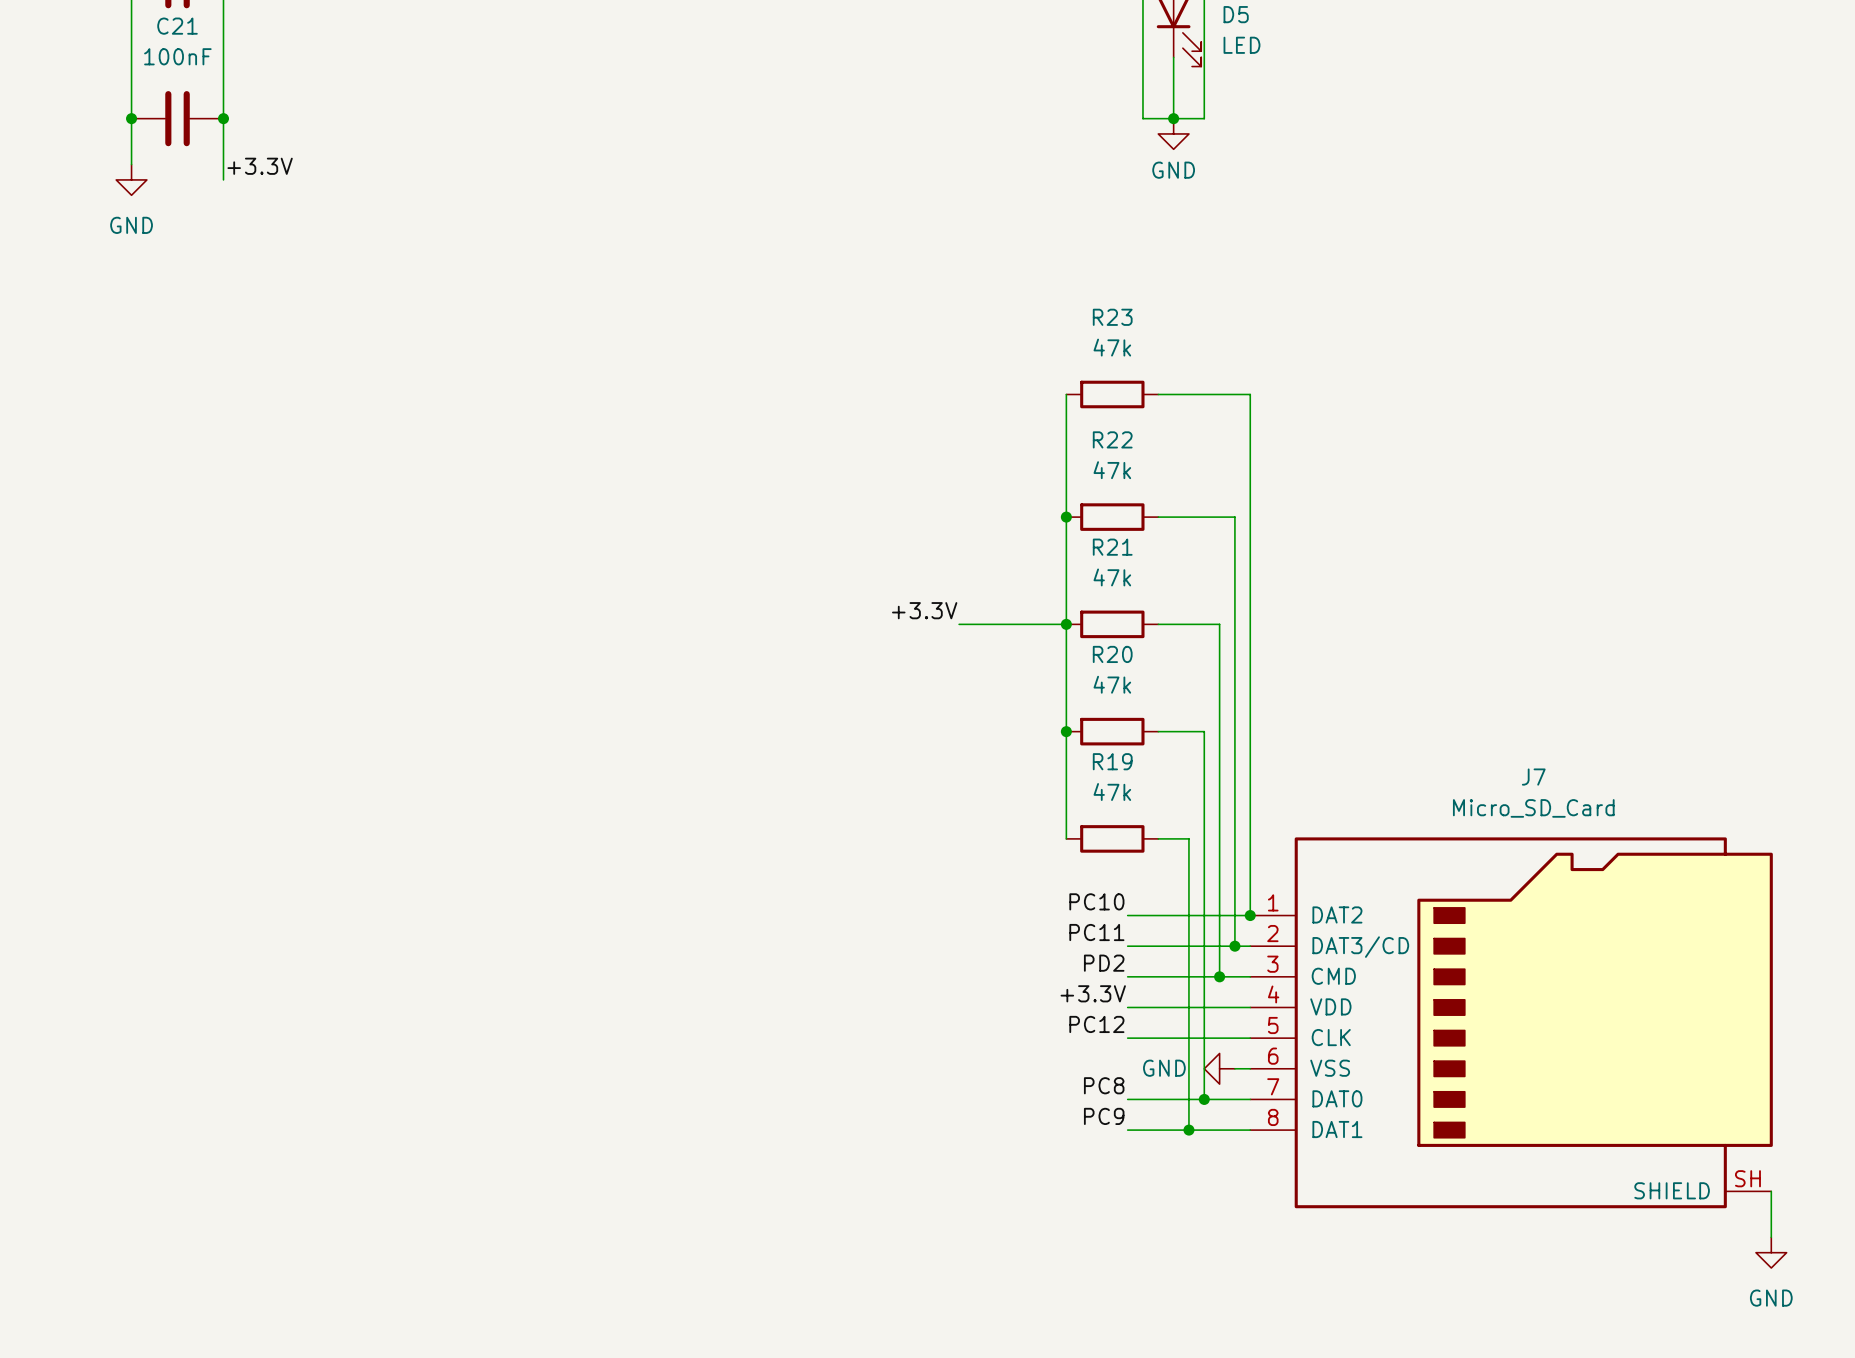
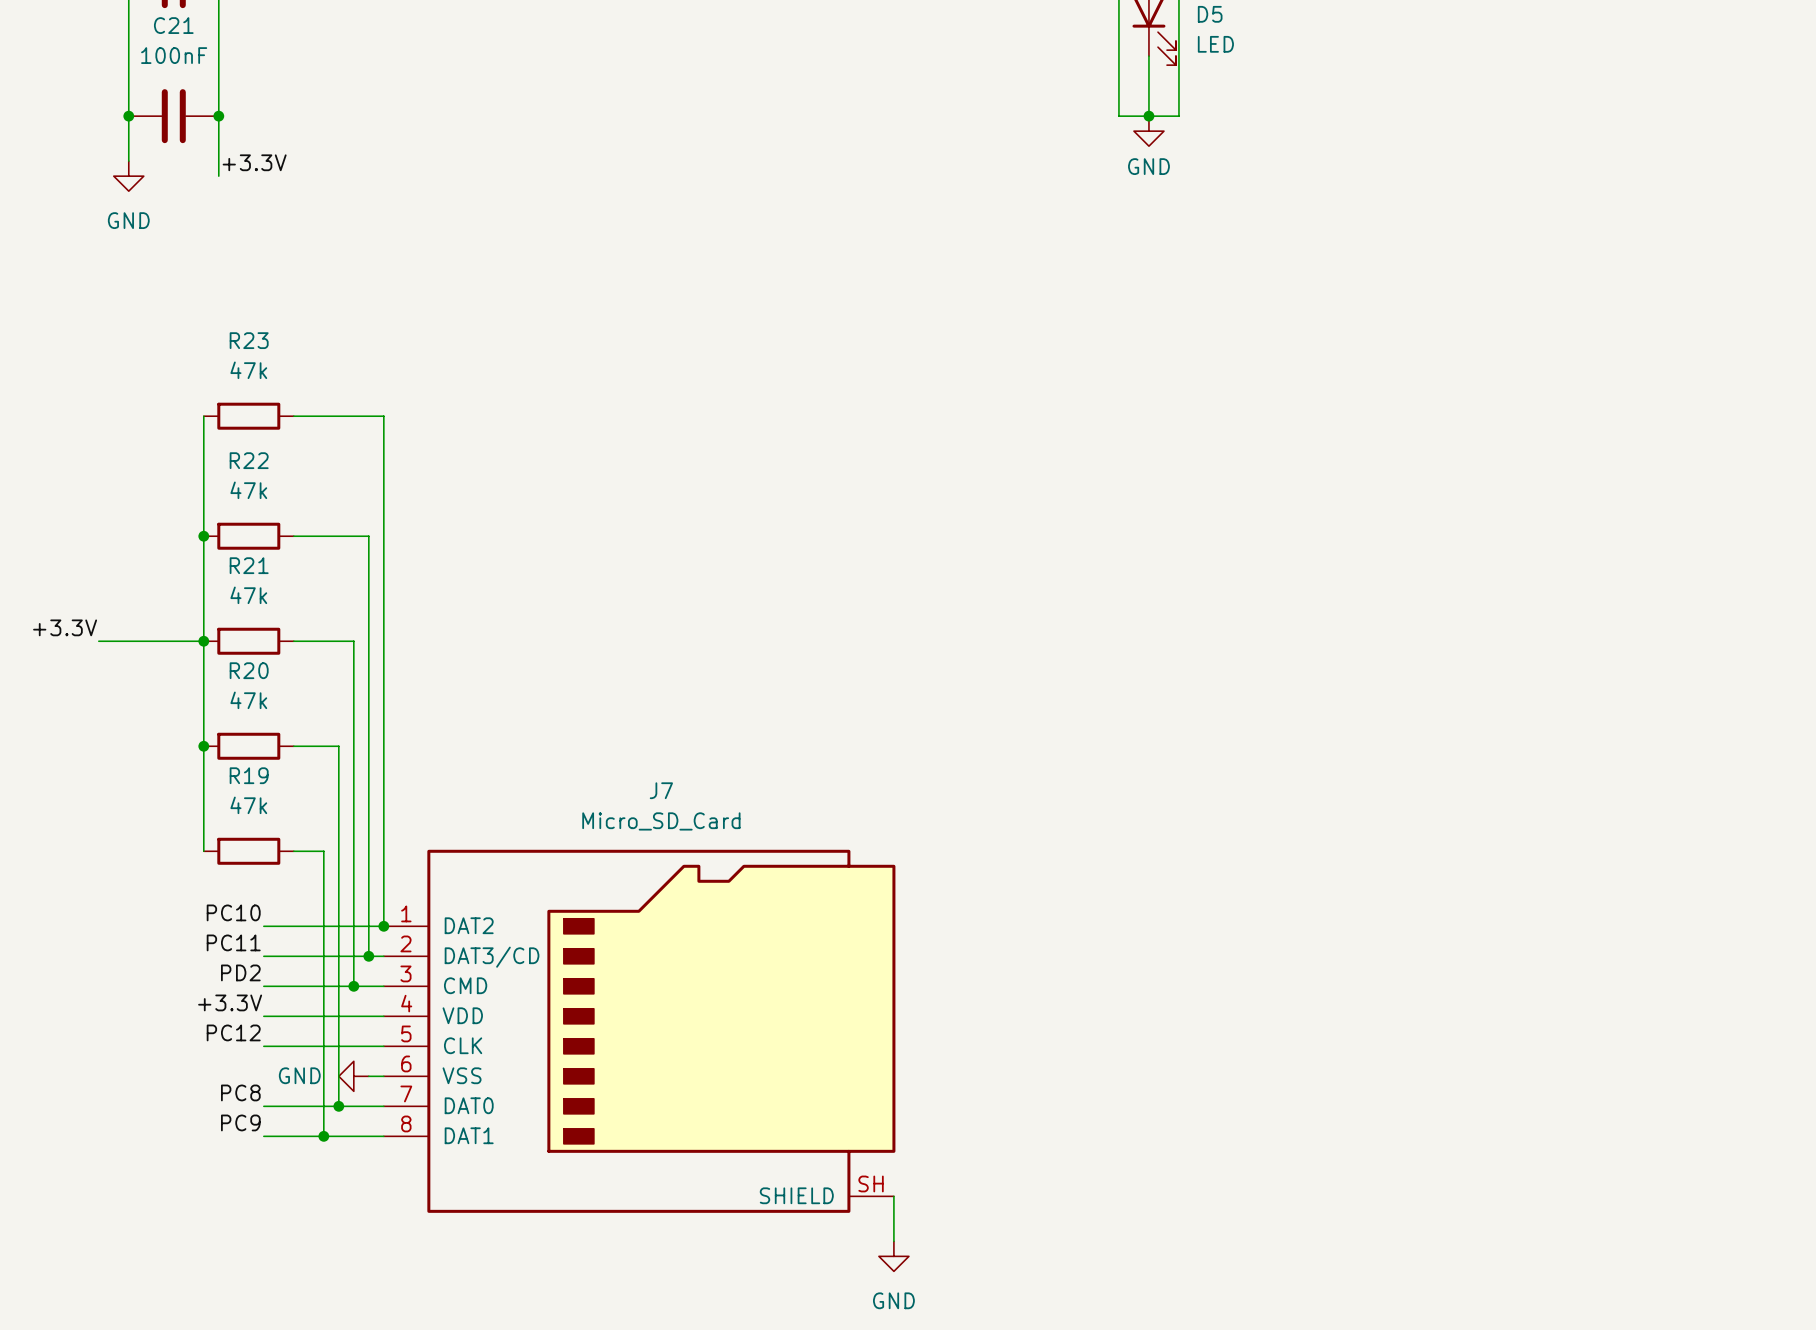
wire: (1066, 394) (1066, 838) -> none
R23 position: (1112, 394) -> (248, 416)
wire: (1158, 394) (1250, 394) (1250, 915) (1127, 915) -> none
wire: none -> (203, 416) (203, 851)
wire: none -> (293, 416) (383, 416) (383, 926) (263, 926)
junction: (1066, 517) -> none
R22 position: (1112, 517) -> (248, 536)
wire: (1158, 517) (1234, 517) (1234, 946) -> none
junction: none -> (203, 536)
wire: none -> (293, 536) (368, 536) (368, 956)
label: +3.3V (924, 610) -> none
wire: (959, 624) (1066, 624) -> none
junction: (1066, 624) -> none
R21 position: (1112, 624) -> (248, 641)
wire: (1158, 624) (1219, 624) (1219, 976) -> none
label: none -> +3.3V (65, 627)
wire: none -> (98, 641) (203, 641)
junction: none -> (203, 641)
wire: none -> (293, 641) (353, 641) (353, 986)
junction: (1066, 731) -> none
R20 position: (1112, 731) -> (248, 746)
wire: (1158, 731) (1204, 731) (1204, 1099) -> none
junction: none -> (203, 746)
wire: none -> (293, 746) (338, 746) (338, 1106)
R19 position: (1112, 838) -> (248, 851)
wire: (1158, 838) (1188, 838) (1188, 1130) -> none
wire: none -> (293, 851) (323, 851) (323, 1136)
label: PC10 (1096, 901) -> none
junction: (1250, 915) -> none
label: none -> PC10 (233, 912)
label: PC11 (1096, 932) -> none
junction: none -> (383, 926)
wire: (1127, 946) (1250, 946) -> none
junction: (1234, 946) -> none
label: none -> PC11 (233, 942)
label: PD2 (1104, 963) -> none
wire: none -> (263, 956) (383, 956)
junction: none -> (368, 956)
wire: (1127, 976) (1250, 976) -> none
junction: (1219, 976) -> none
label: none -> PD2 (240, 972)
label: +3.3V (1093, 993) -> none
wire: none -> (263, 986) (383, 986)
junction: none -> (353, 986)
wire: (1127, 1007) (1250, 1007) -> none
J7 position: (1511, 1022) -> (639, 1031)
label: none -> +3.3V (230, 1002)
label: PC12 (1096, 1024) -> none
wire: none -> (263, 1016) (383, 1016)
wire: (1127, 1038) (1250, 1038) -> none
label: none -> PC12 (233, 1032)
wire: none -> (263, 1046) (383, 1046)
power symbol: GND (1219, 1068) -> none
wire: (1234, 1068) (1250, 1068) -> none
label: PC8 (1104, 1085) -> none
power symbol: none -> GND (353, 1076)
wire: none -> (368, 1076) (383, 1076)
wire: (1127, 1099) (1250, 1099) -> none
junction: (1204, 1099) -> none
label: none -> PC8 (240, 1092)
label: PC9 (1104, 1116) -> none
wire: none -> (263, 1106) (383, 1106)
junction: none -> (338, 1106)
wire: (1127, 1130) (1250, 1130) -> none
junction: (1188, 1130) -> none
label: none -> PC9 (240, 1122)
wire: none -> (263, 1136) (383, 1136)
junction: none -> (323, 1136)
wire: (1771, 1191) (1771, 1237) -> none
wire: none -> (893, 1196) (893, 1241)
power symbol: GND (1771, 1252) -> none
power symbol: none -> GND (893, 1256)

